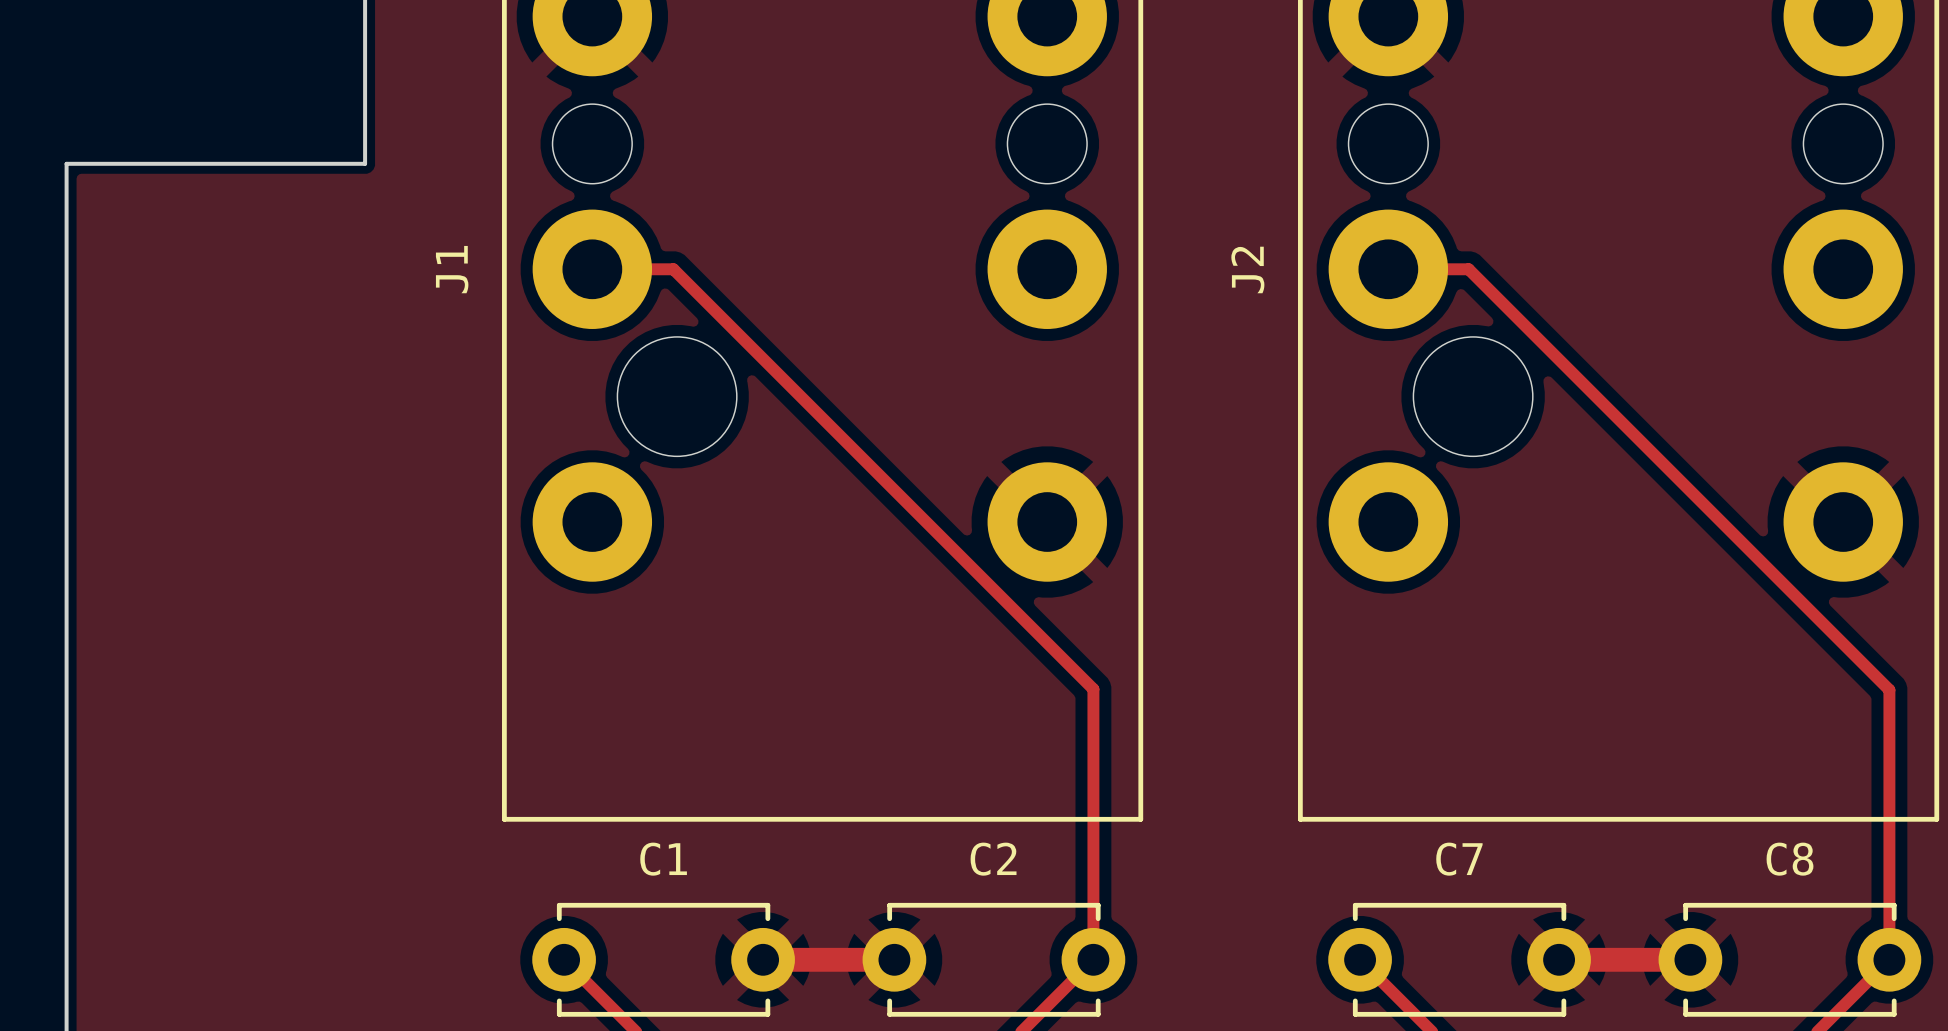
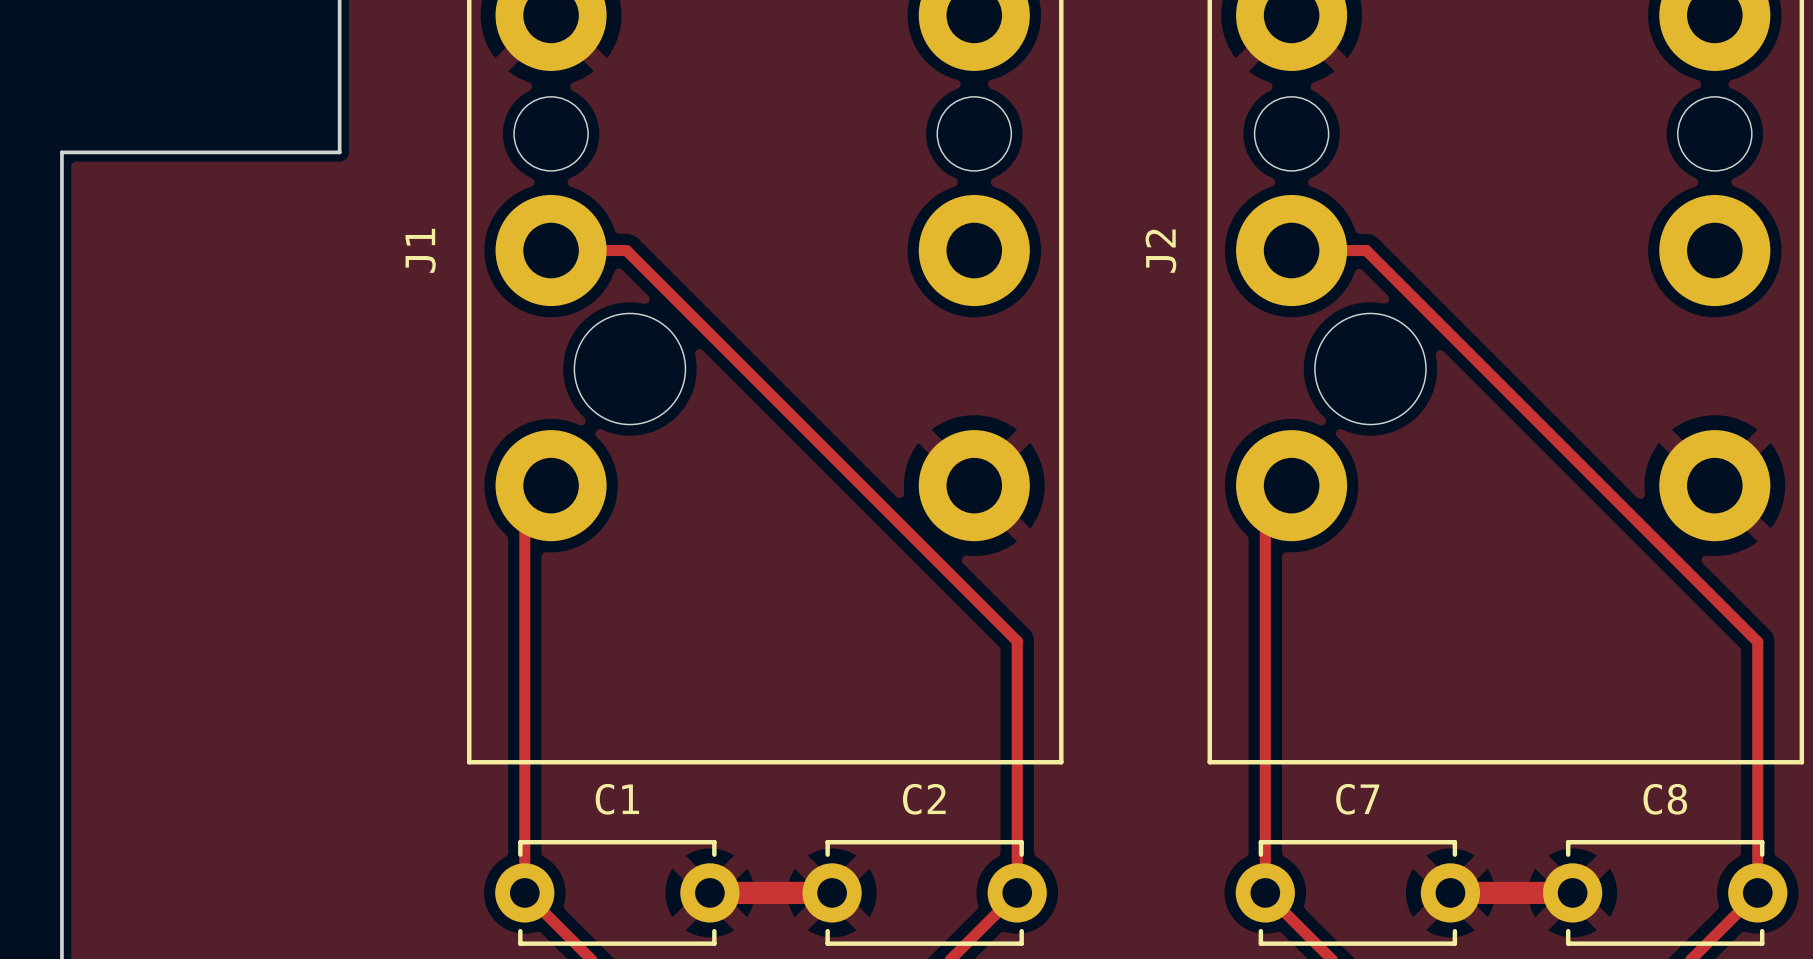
track: none -> (551, 485) (524, 511) (524, 892)
track: none -> (1291, 485) (1265, 511) (1265, 892)

